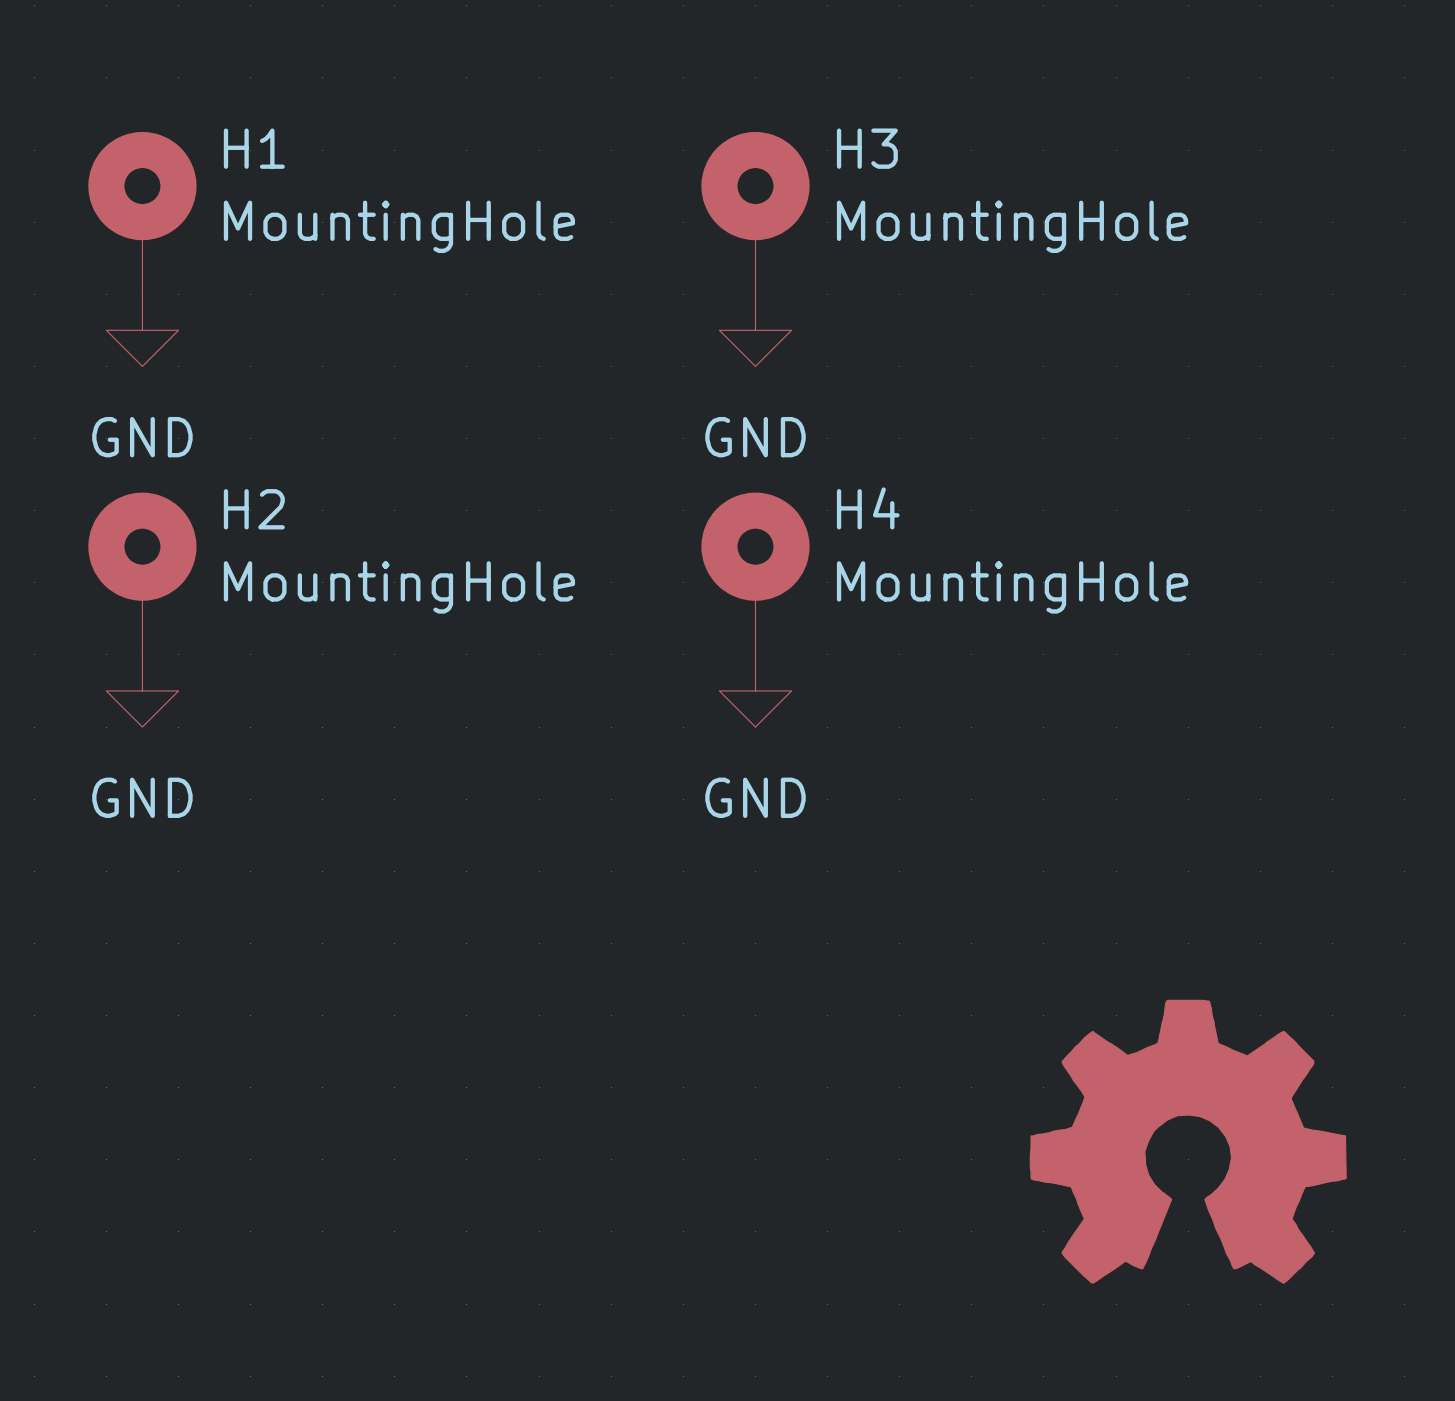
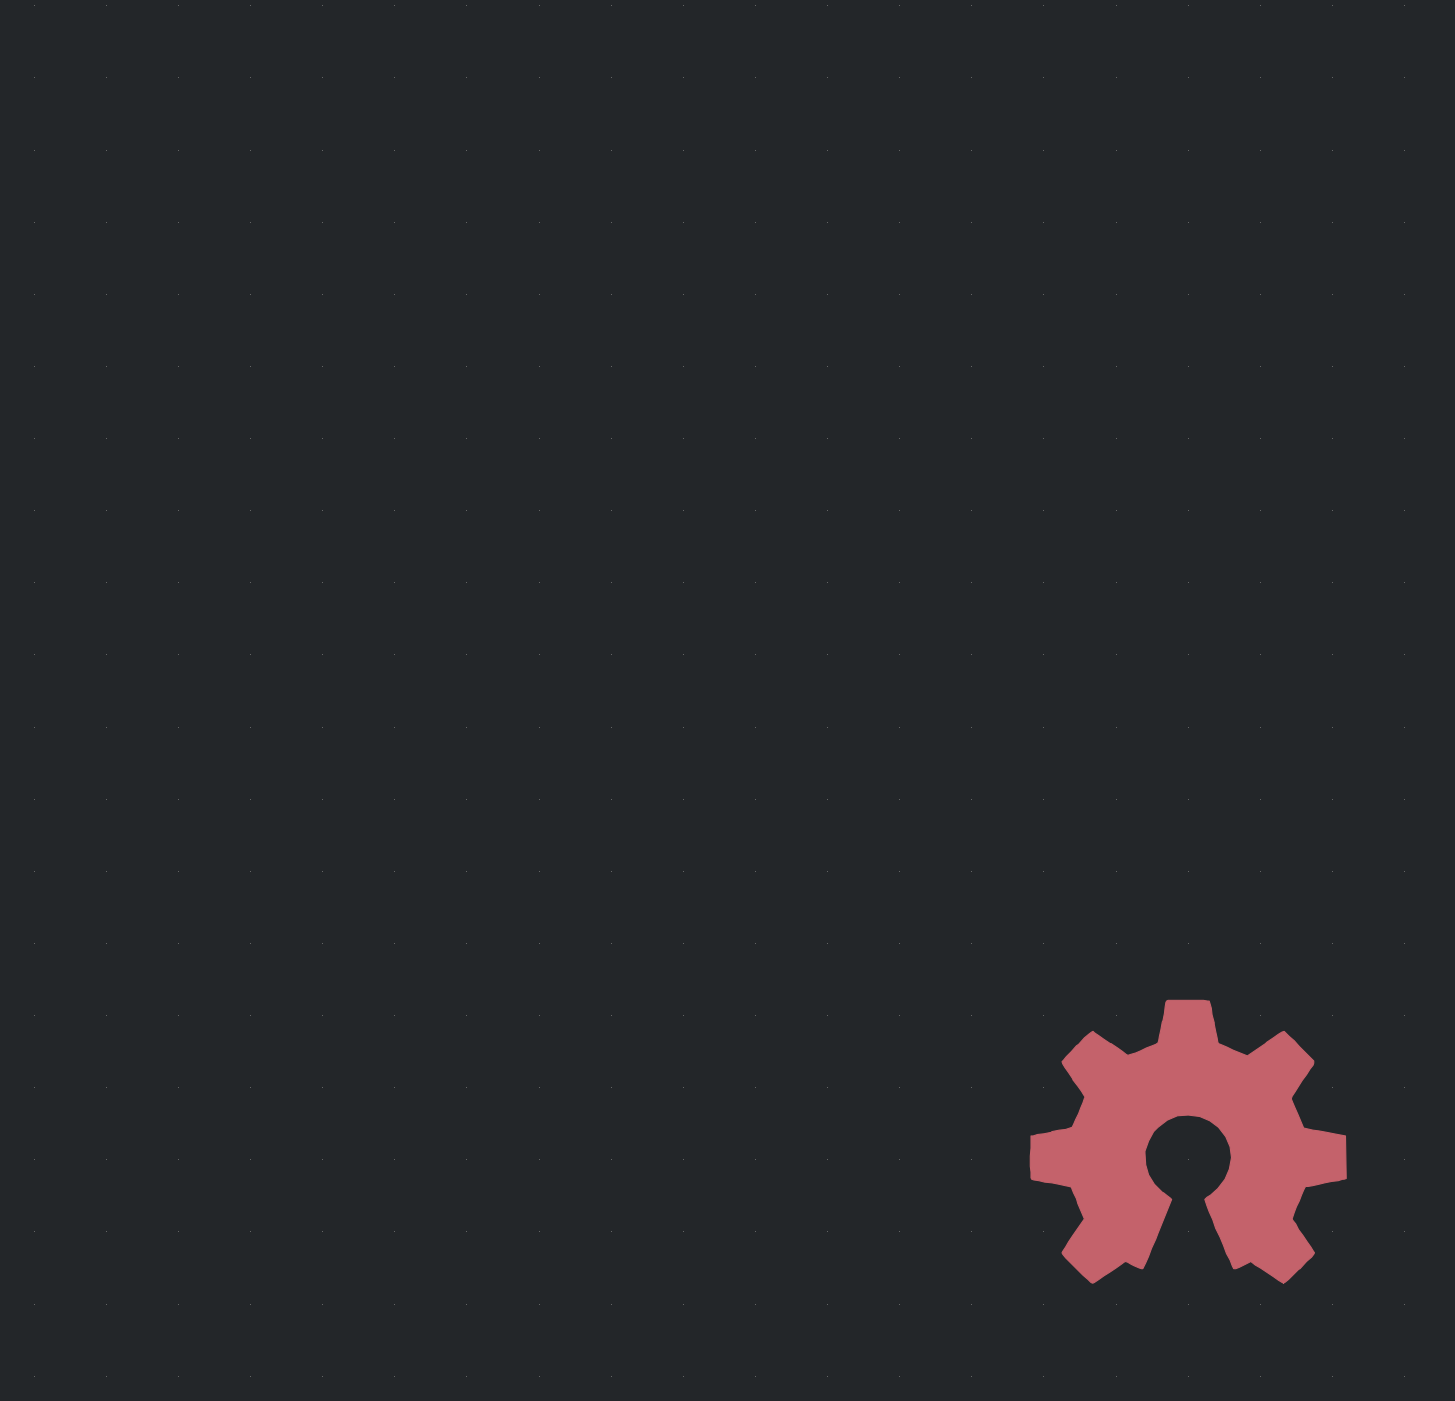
H1: MountingHole (142, 213) -> none
H3: MountingHole (755, 213) -> none
power symbol: GND (142, 330) -> none
power symbol: GND (755, 330) -> none
H2: MountingHole (142, 573) -> none
H4: MountingHole (755, 573) -> none
power symbol: GND (142, 690) -> none
power symbol: GND (755, 690) -> none

